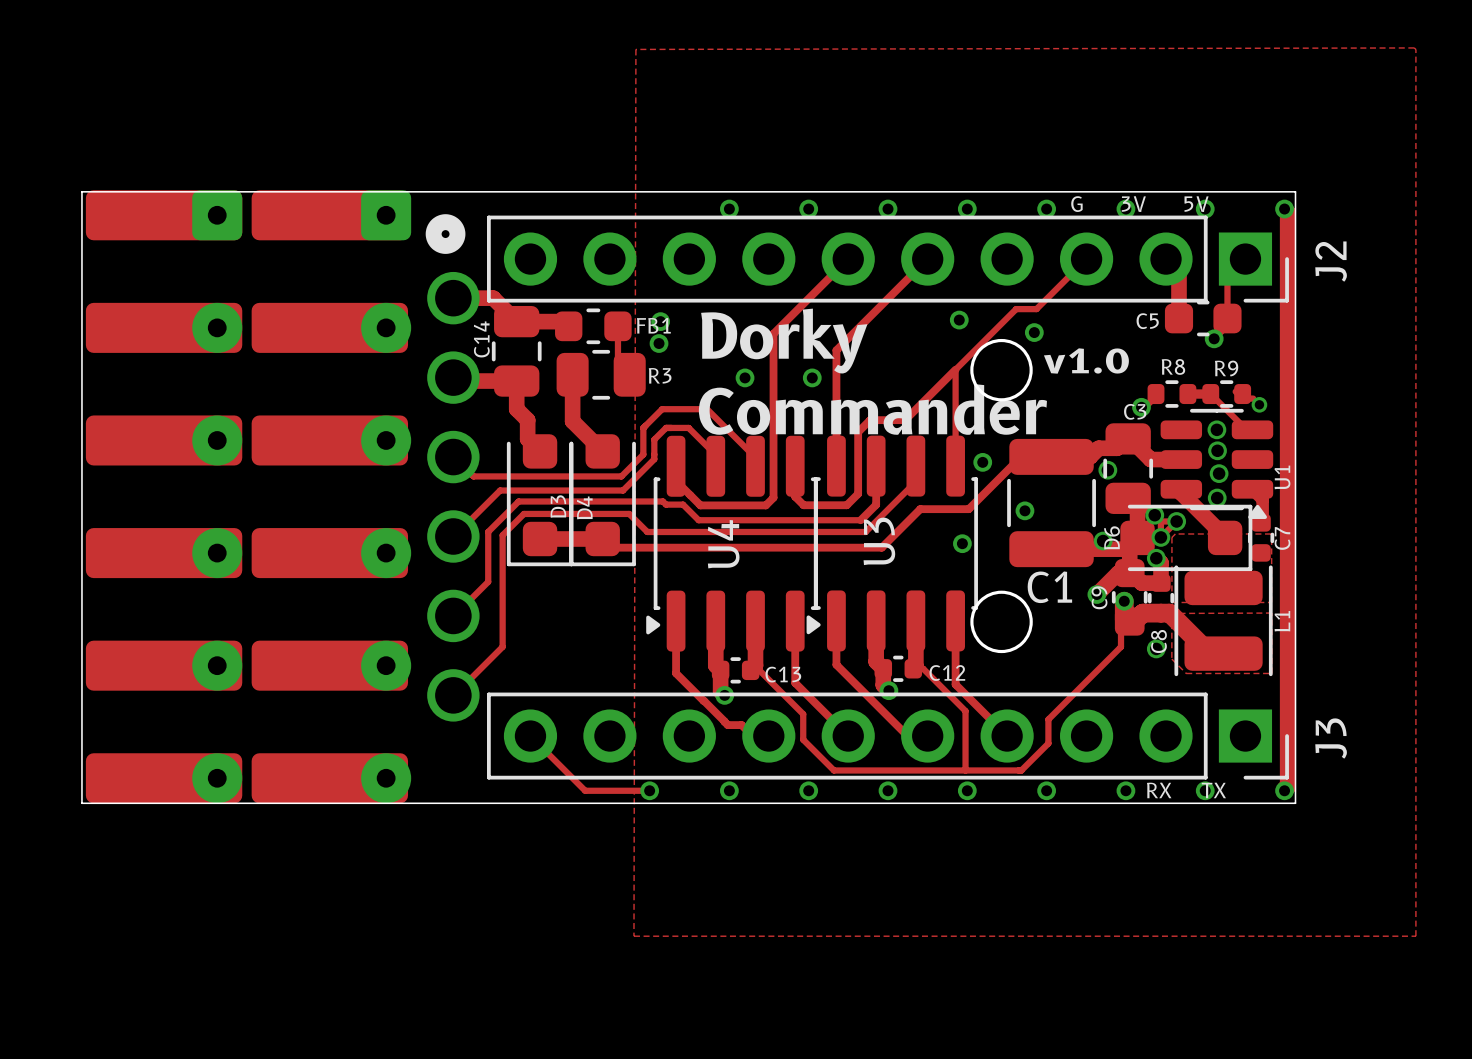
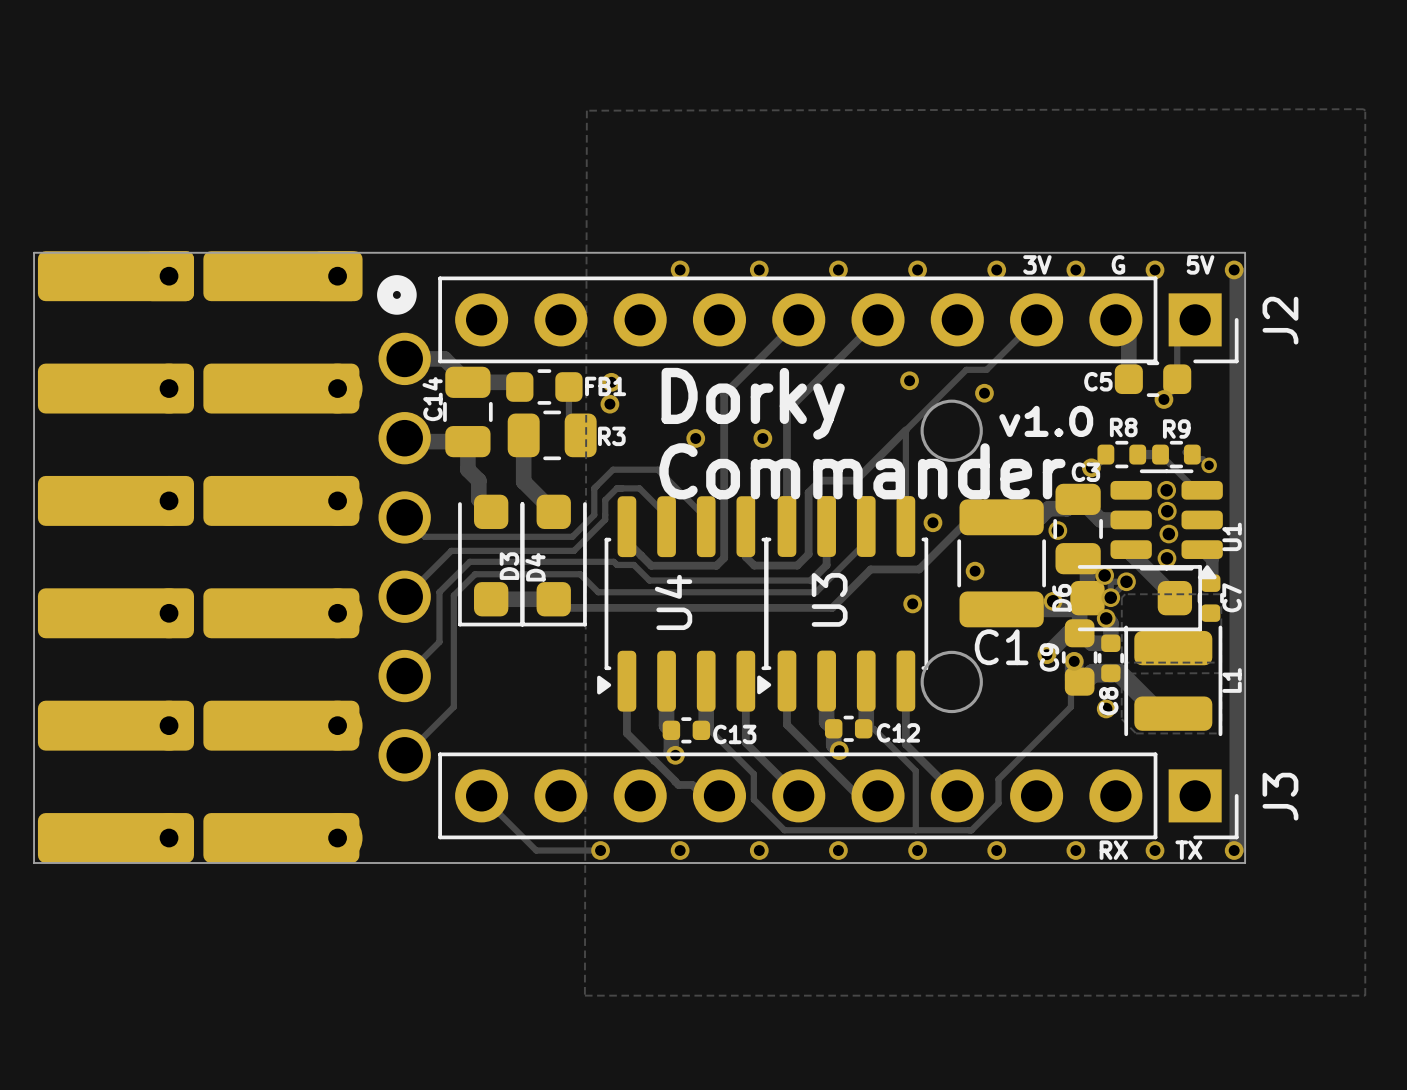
text: G 3V 5V (1139, 204) -> 3V G 5V (1118, 264)

